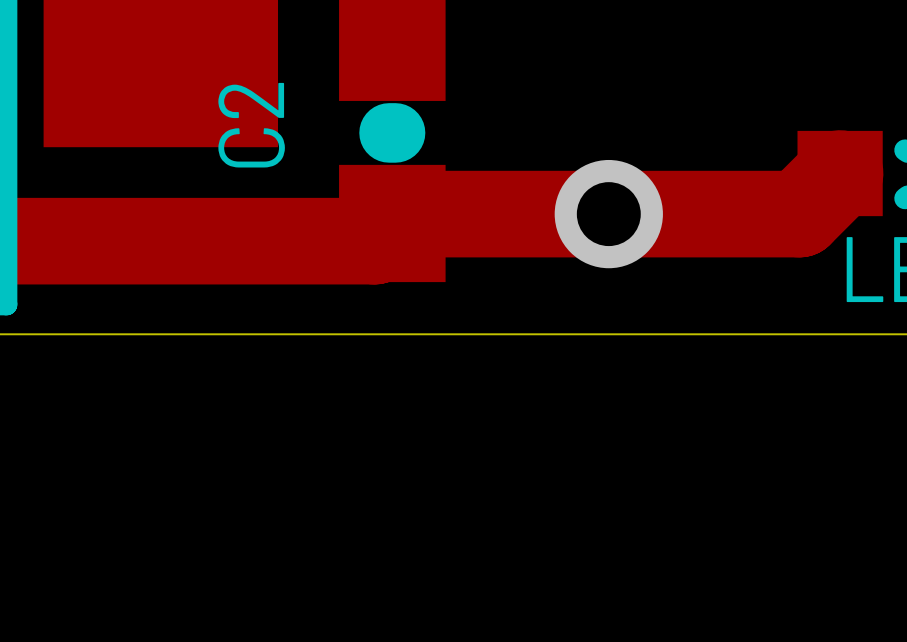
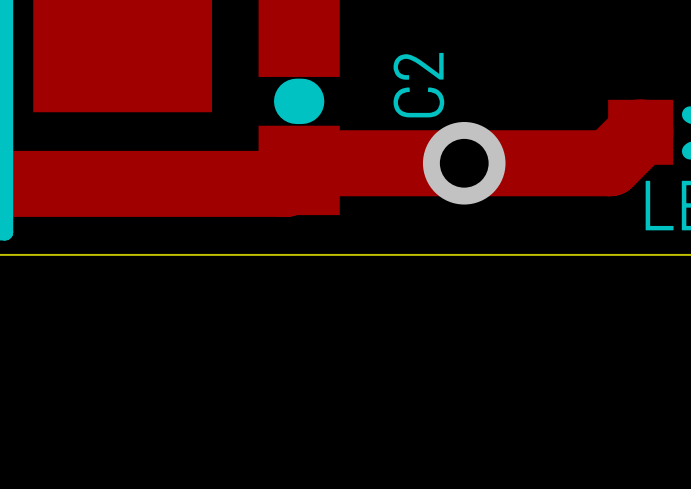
C2 name position: C2 (251, 125) -> C2 (418, 85)

